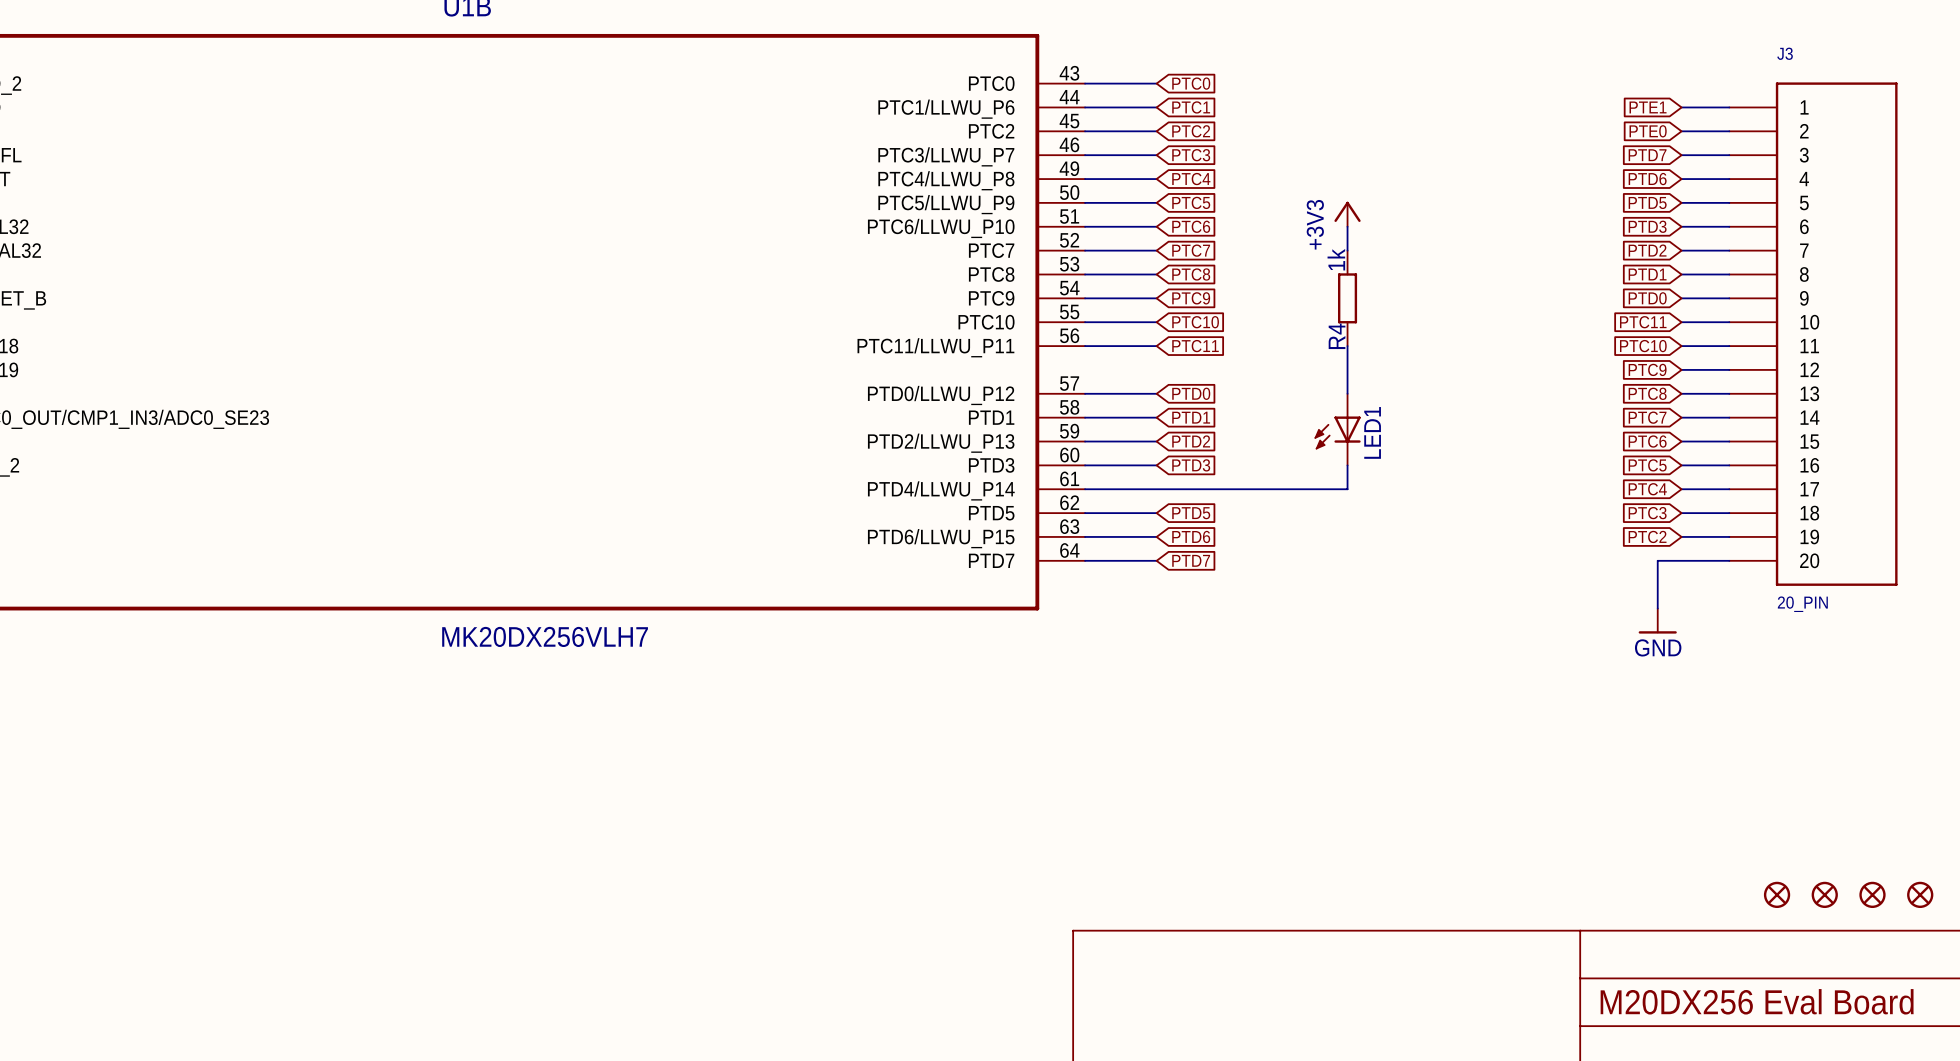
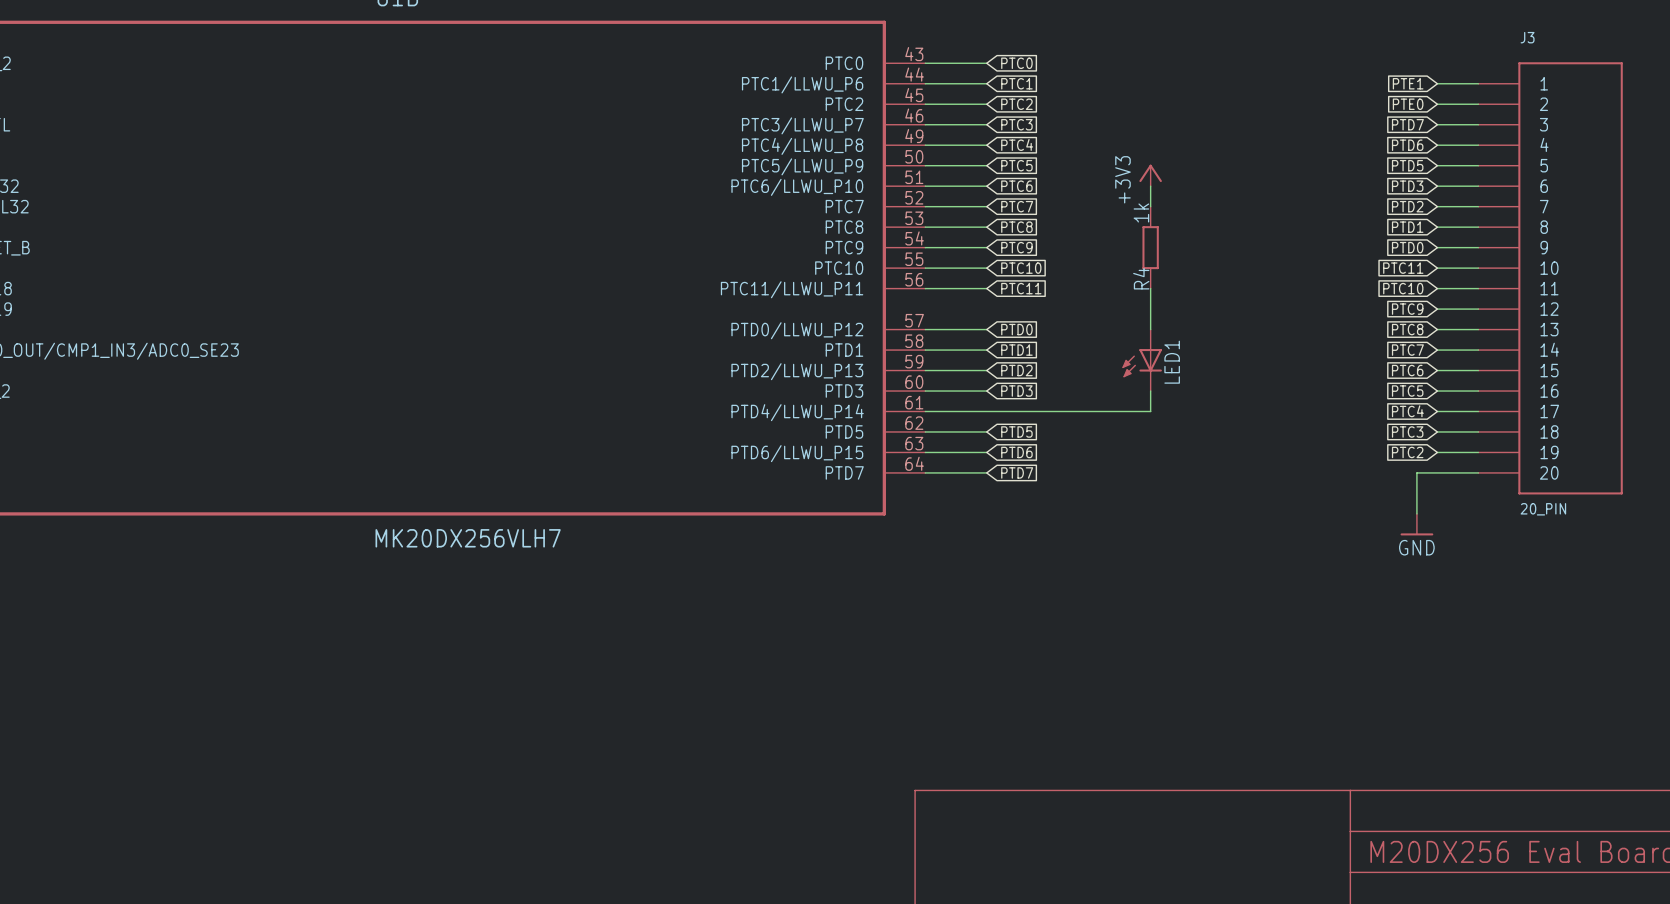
part: (1777, 894) -> none
part: (1824, 894) -> none
part: (1872, 894) -> none
part: (1920, 894) -> none

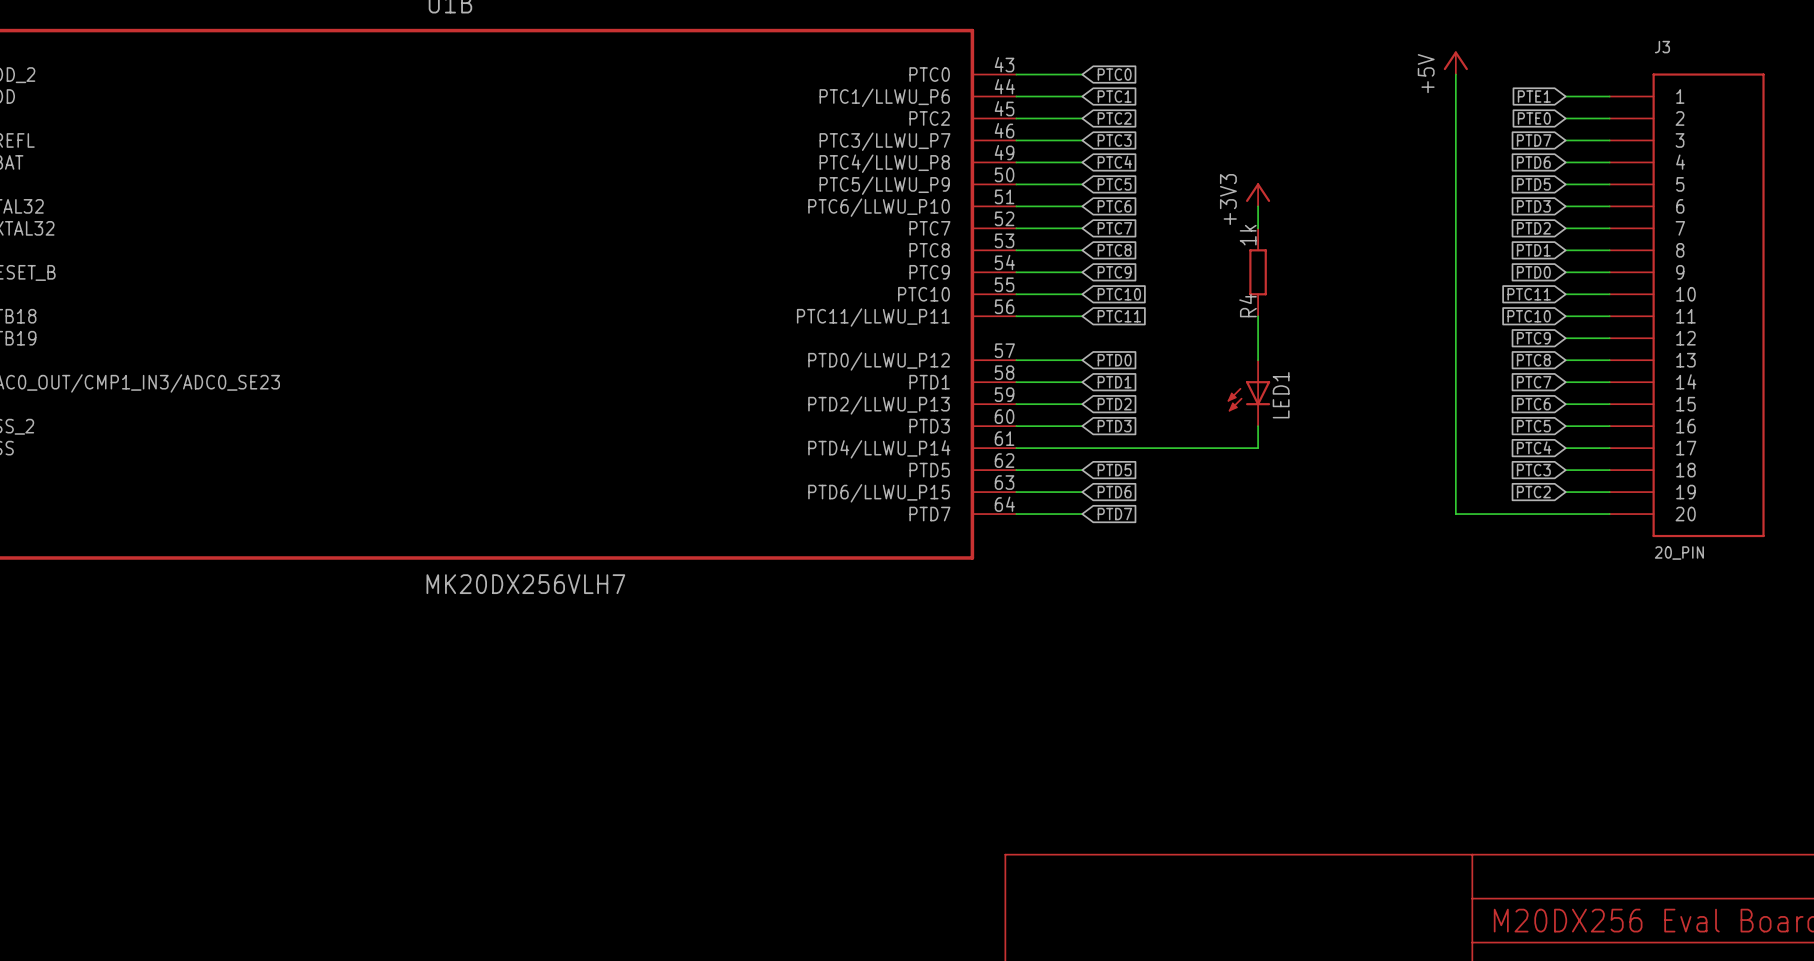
power symbol: none -> +5V (1455, 63)
wire: (1416, 472) (1416, 513) -> (1543, 514) (1455, 514) (1455, 74)
power symbol: GND (1416, 524) -> none

